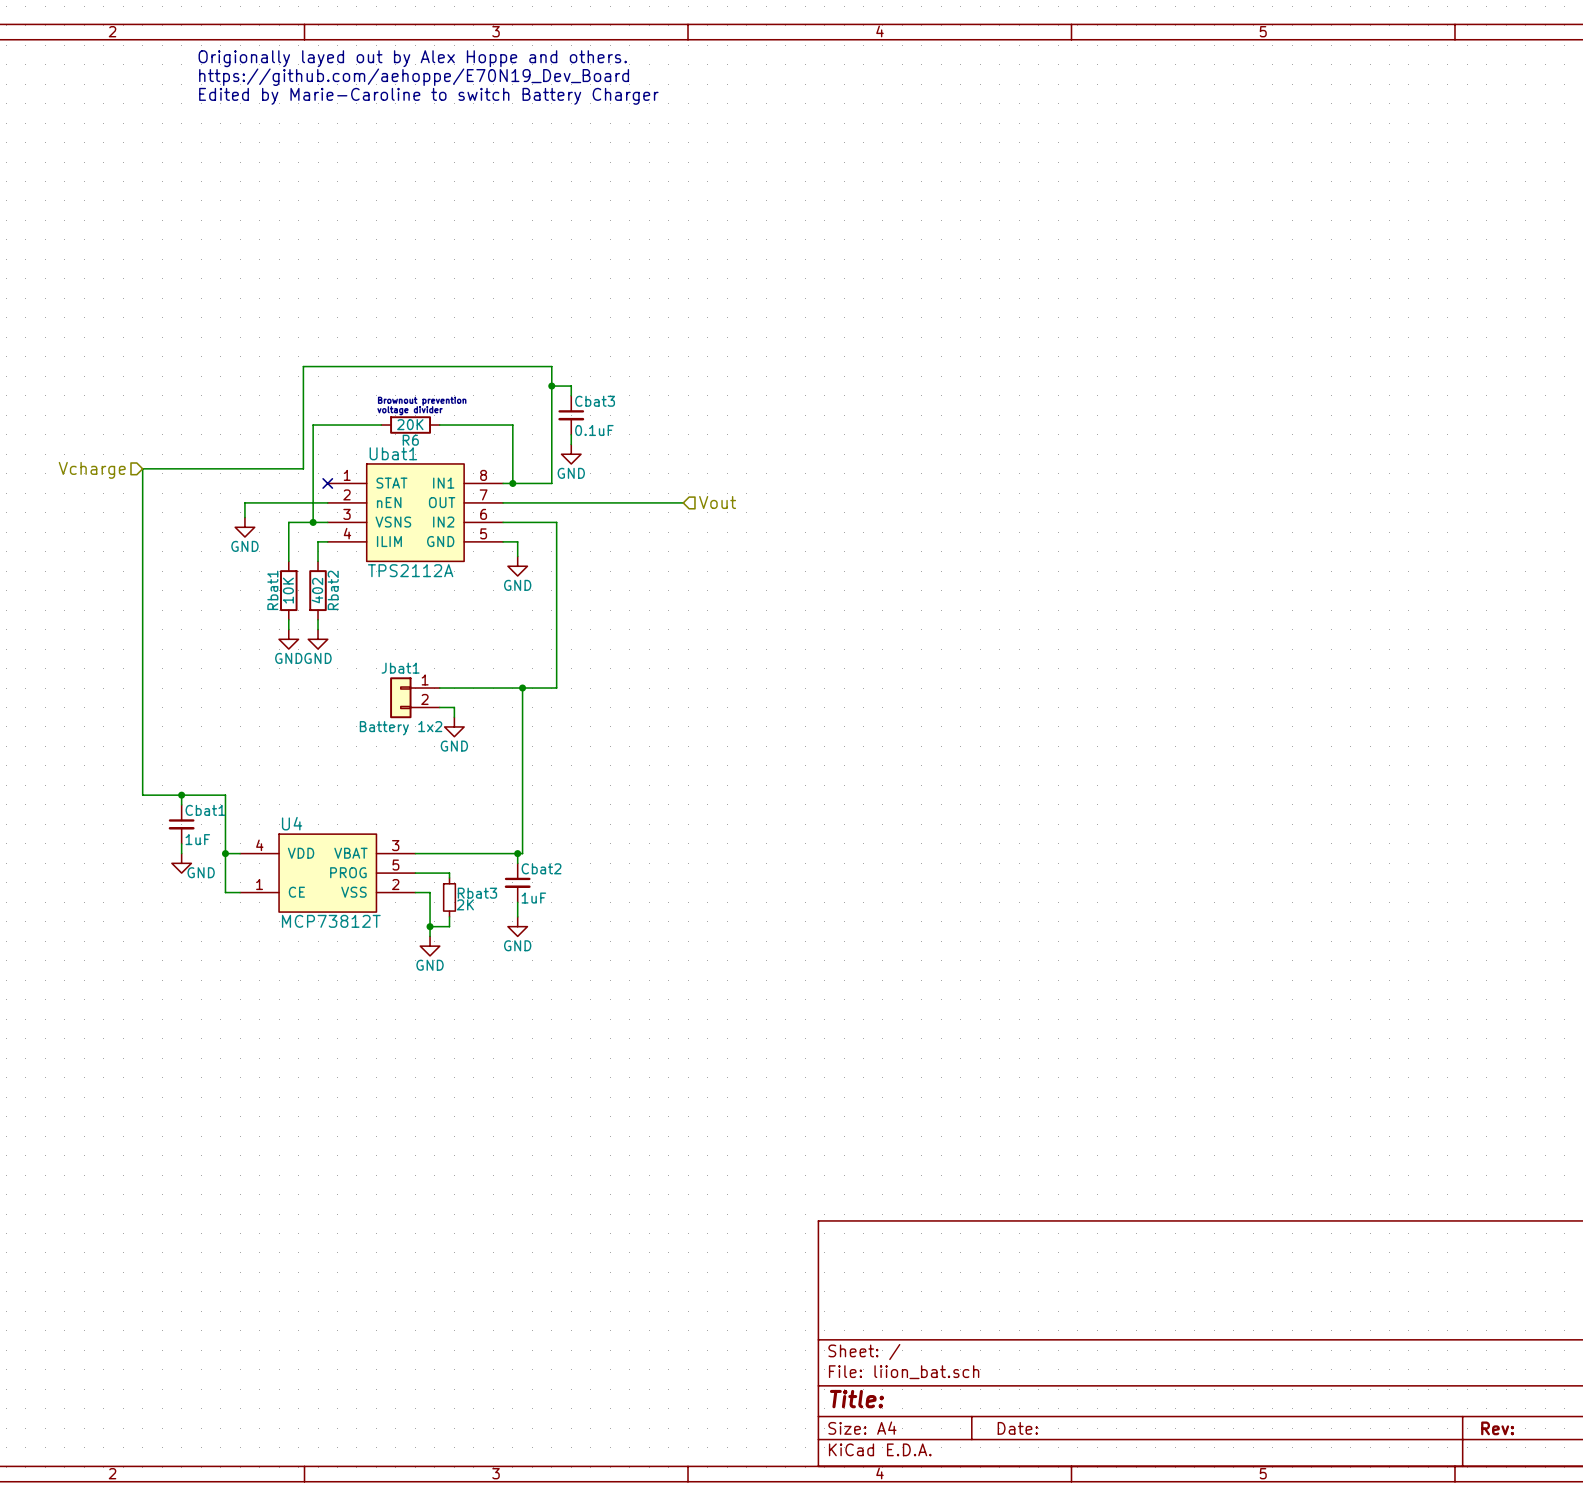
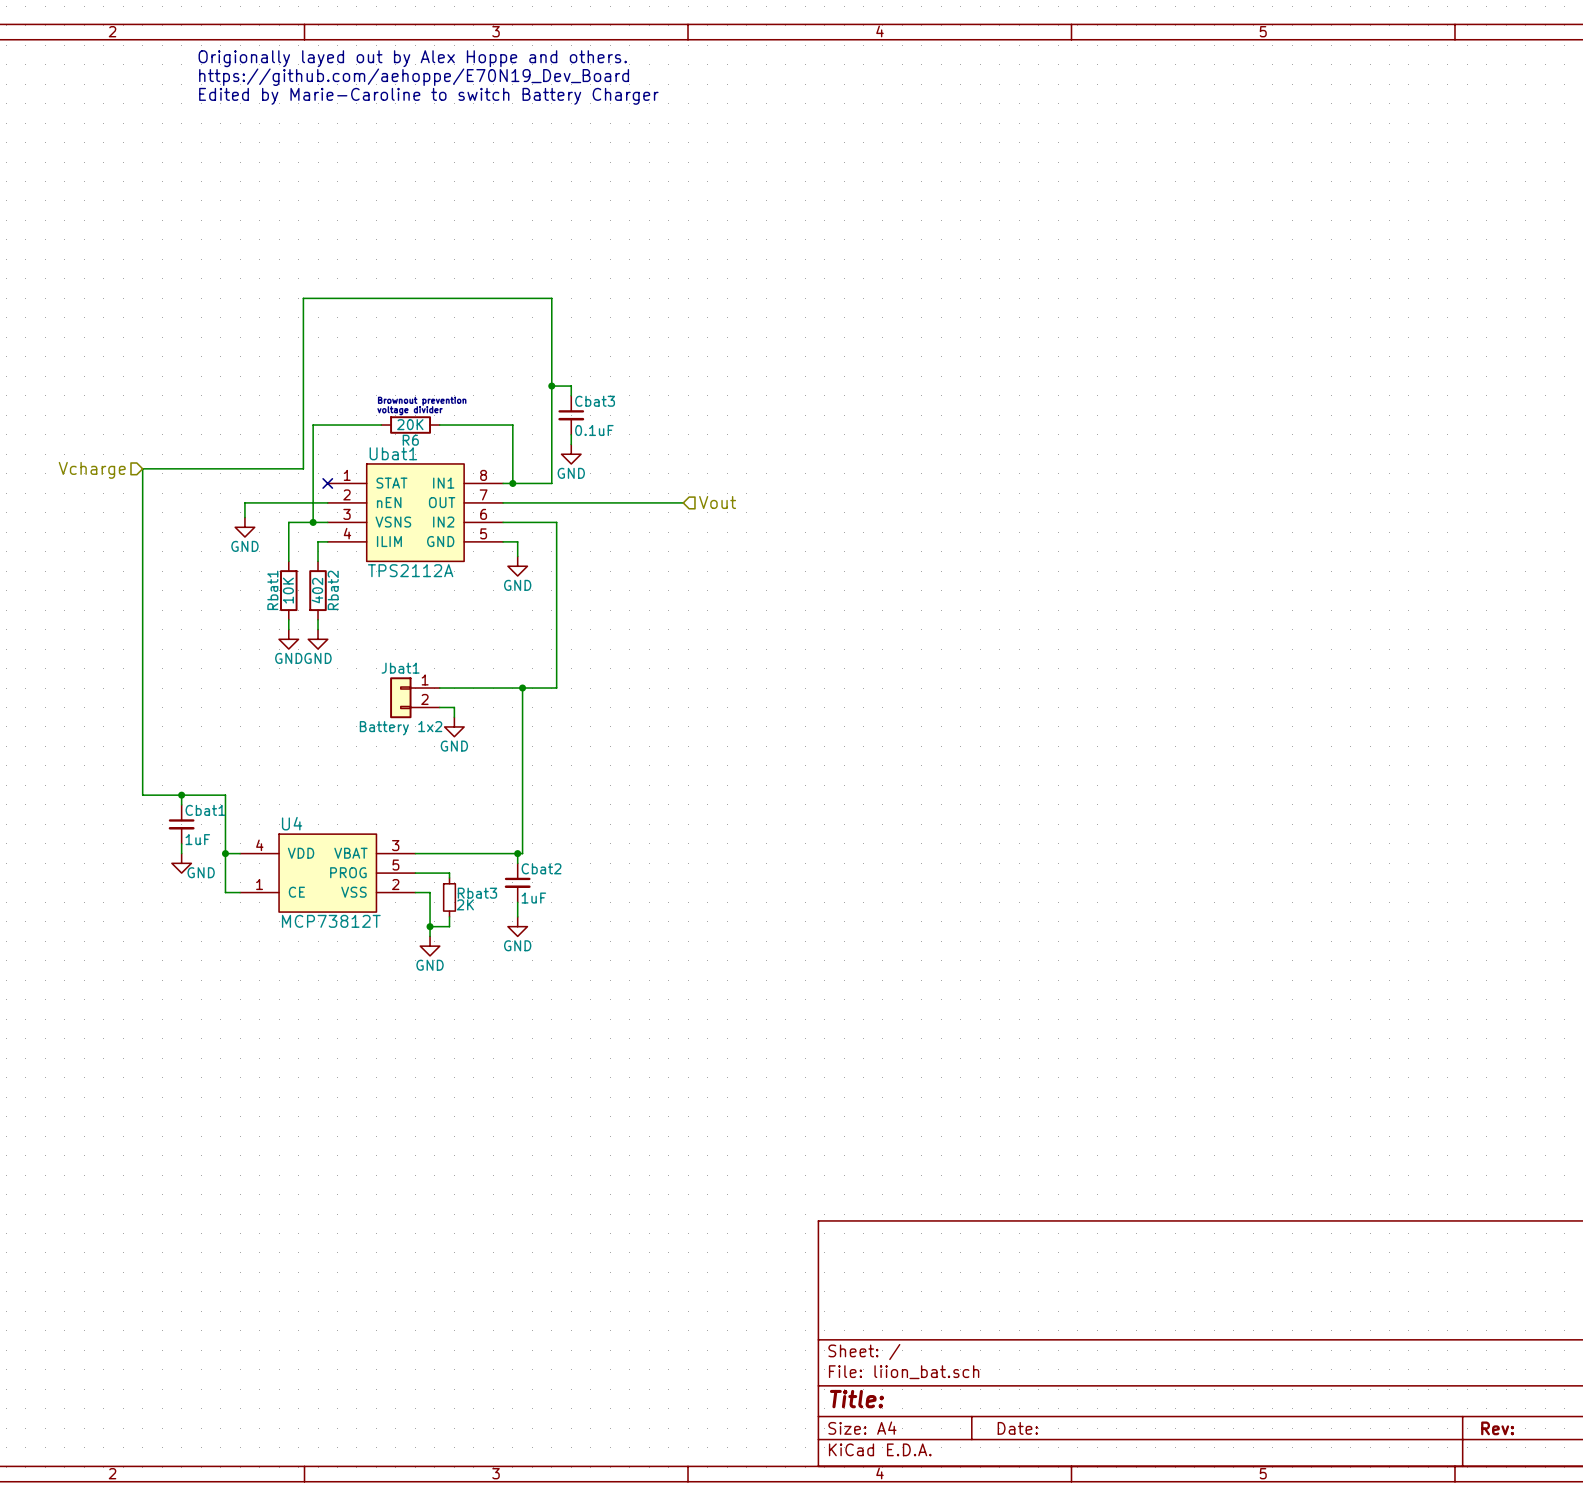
wire: (303, 366) (551, 366) -> (303, 366) (303, 298) (551, 298) (551, 366)

